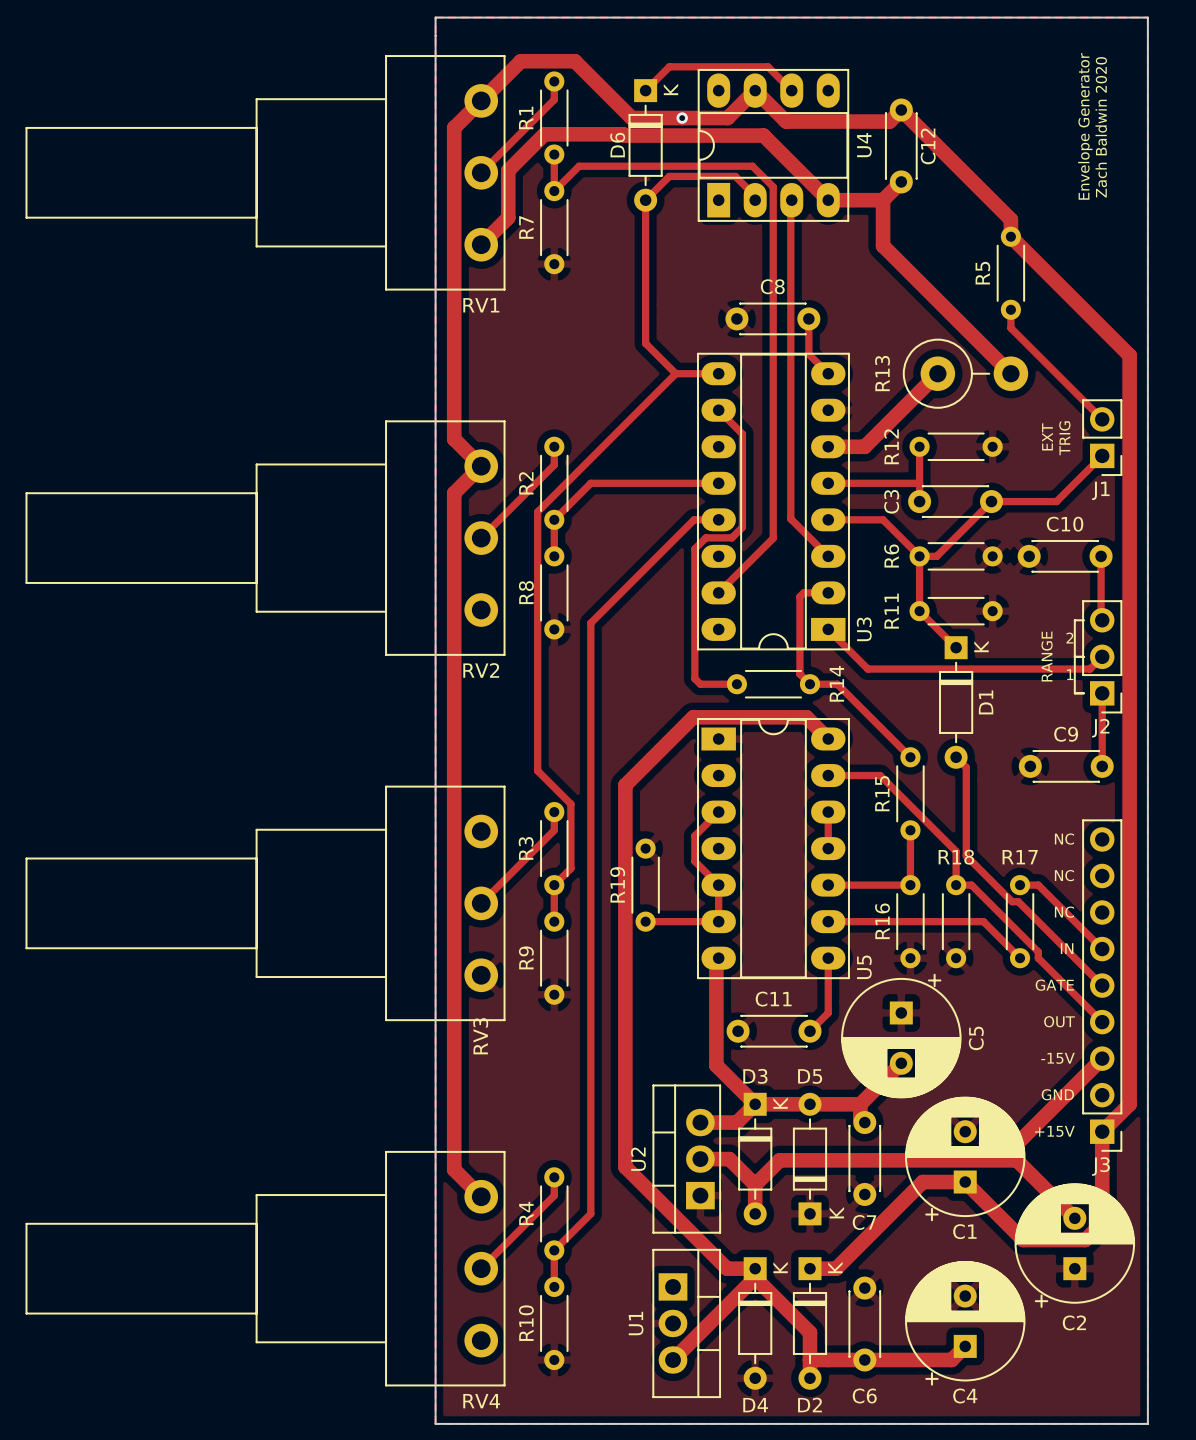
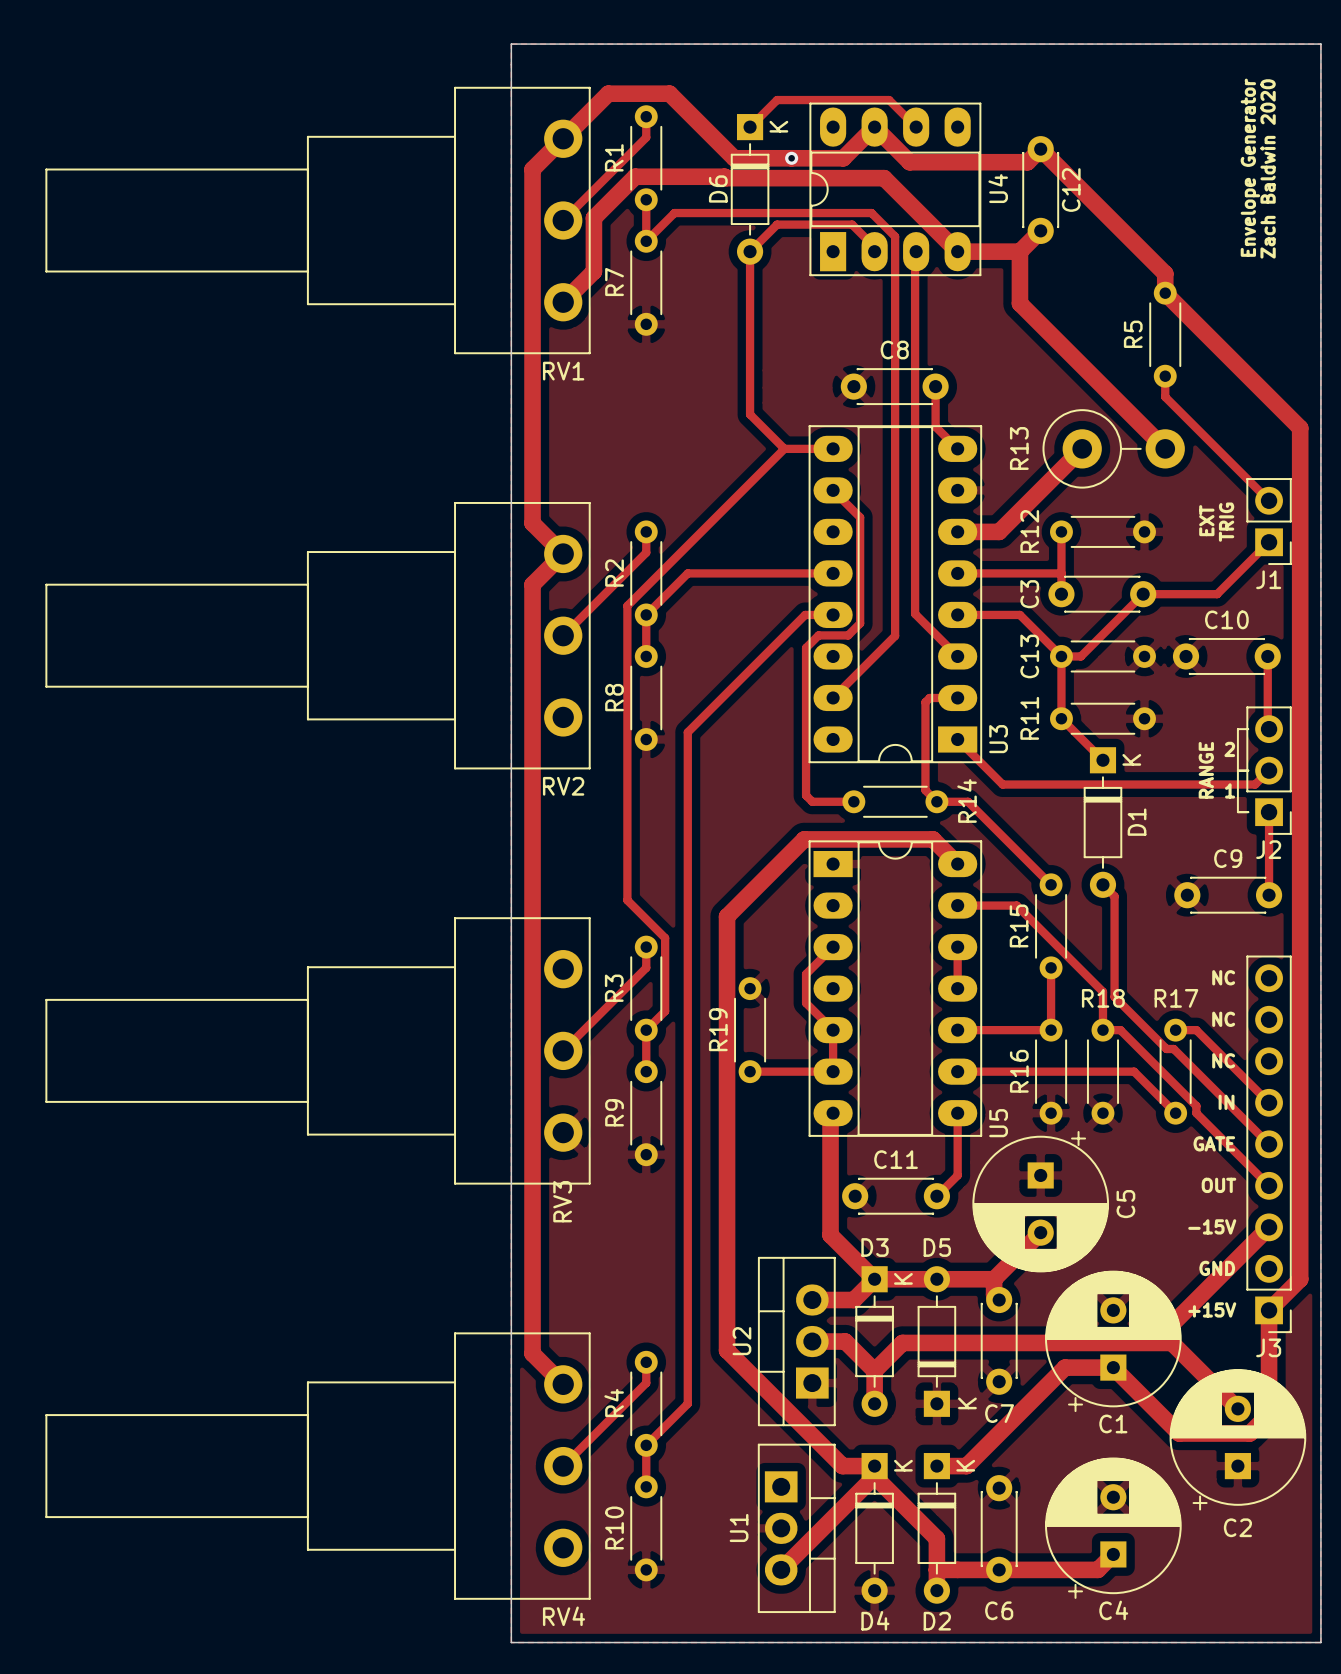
R6 name: R6 (891, 556) -> C13 (1029, 656)

